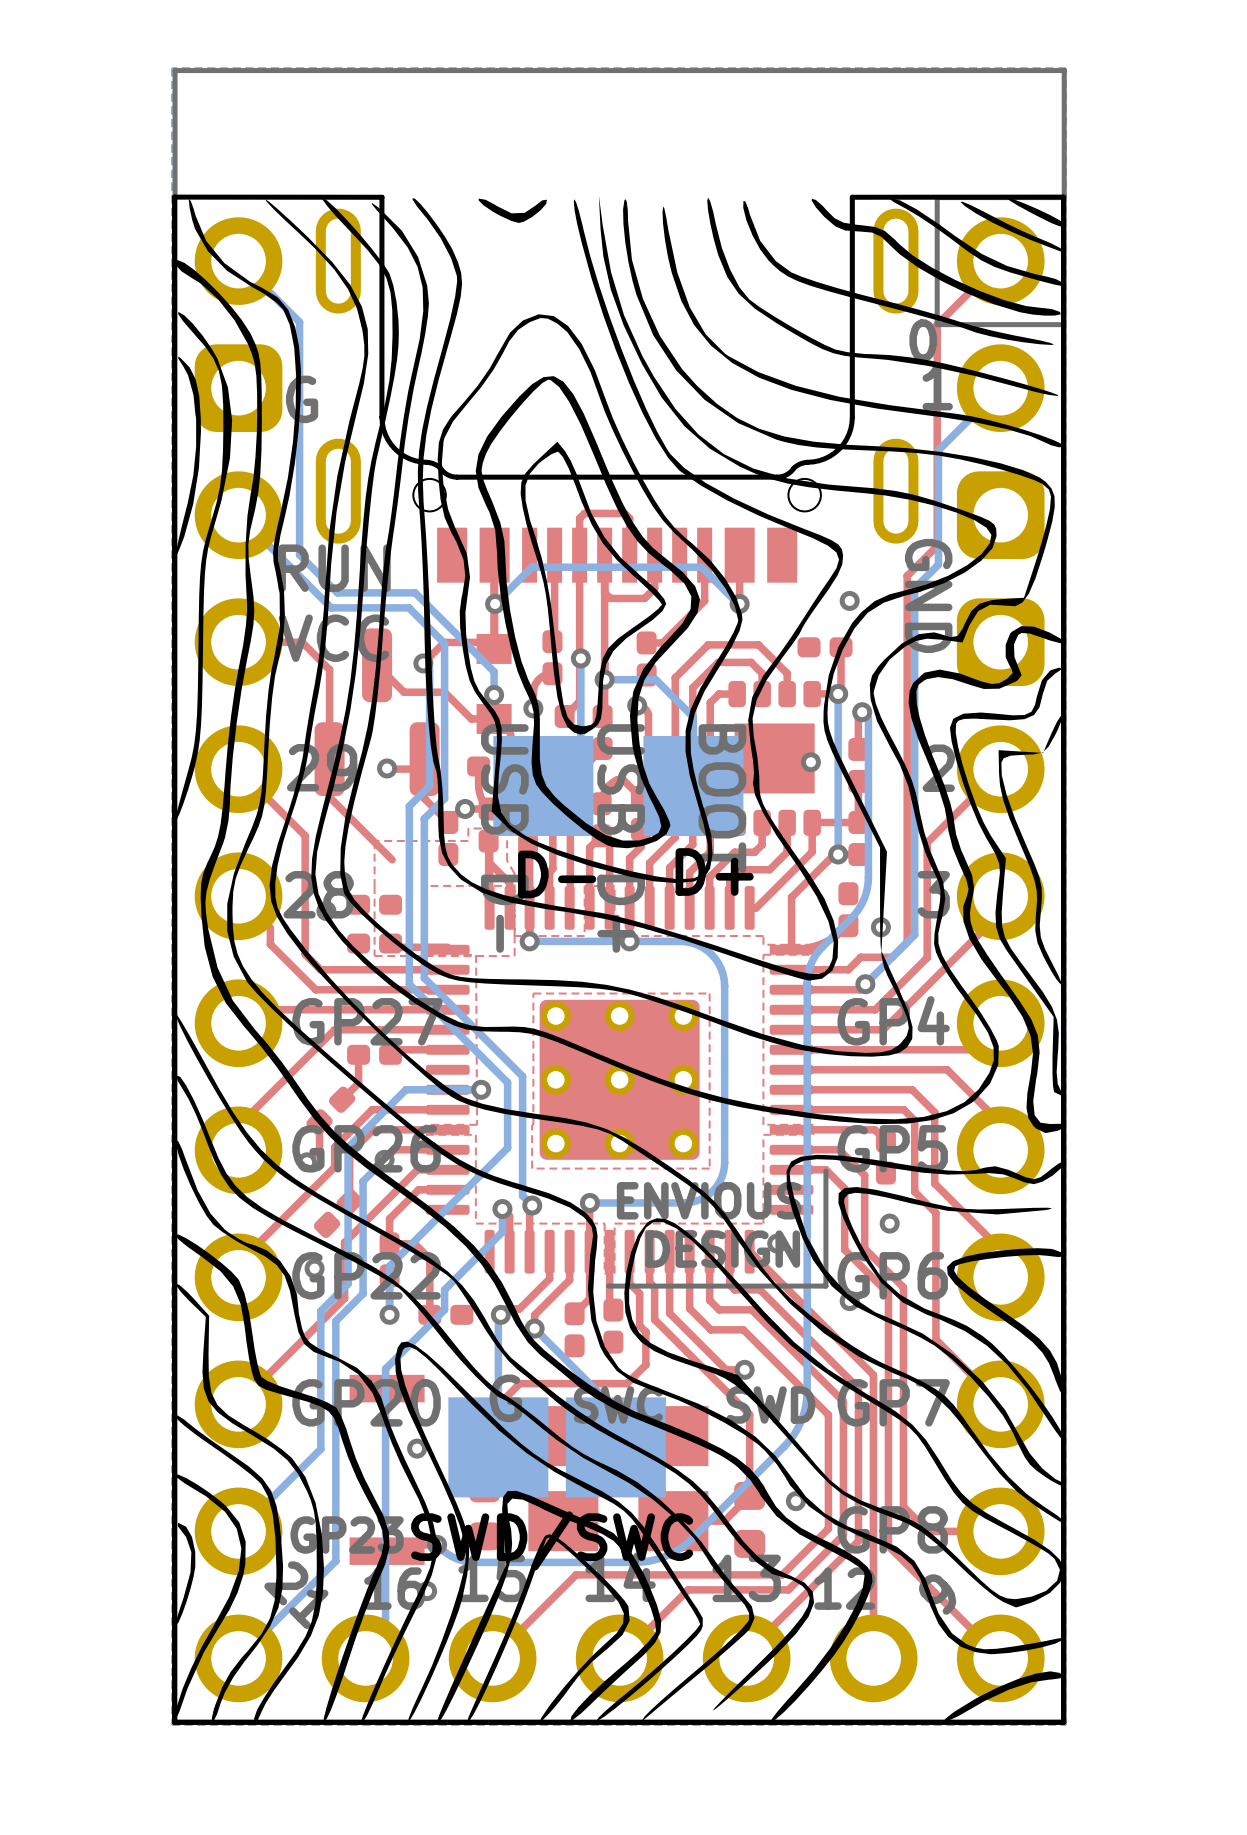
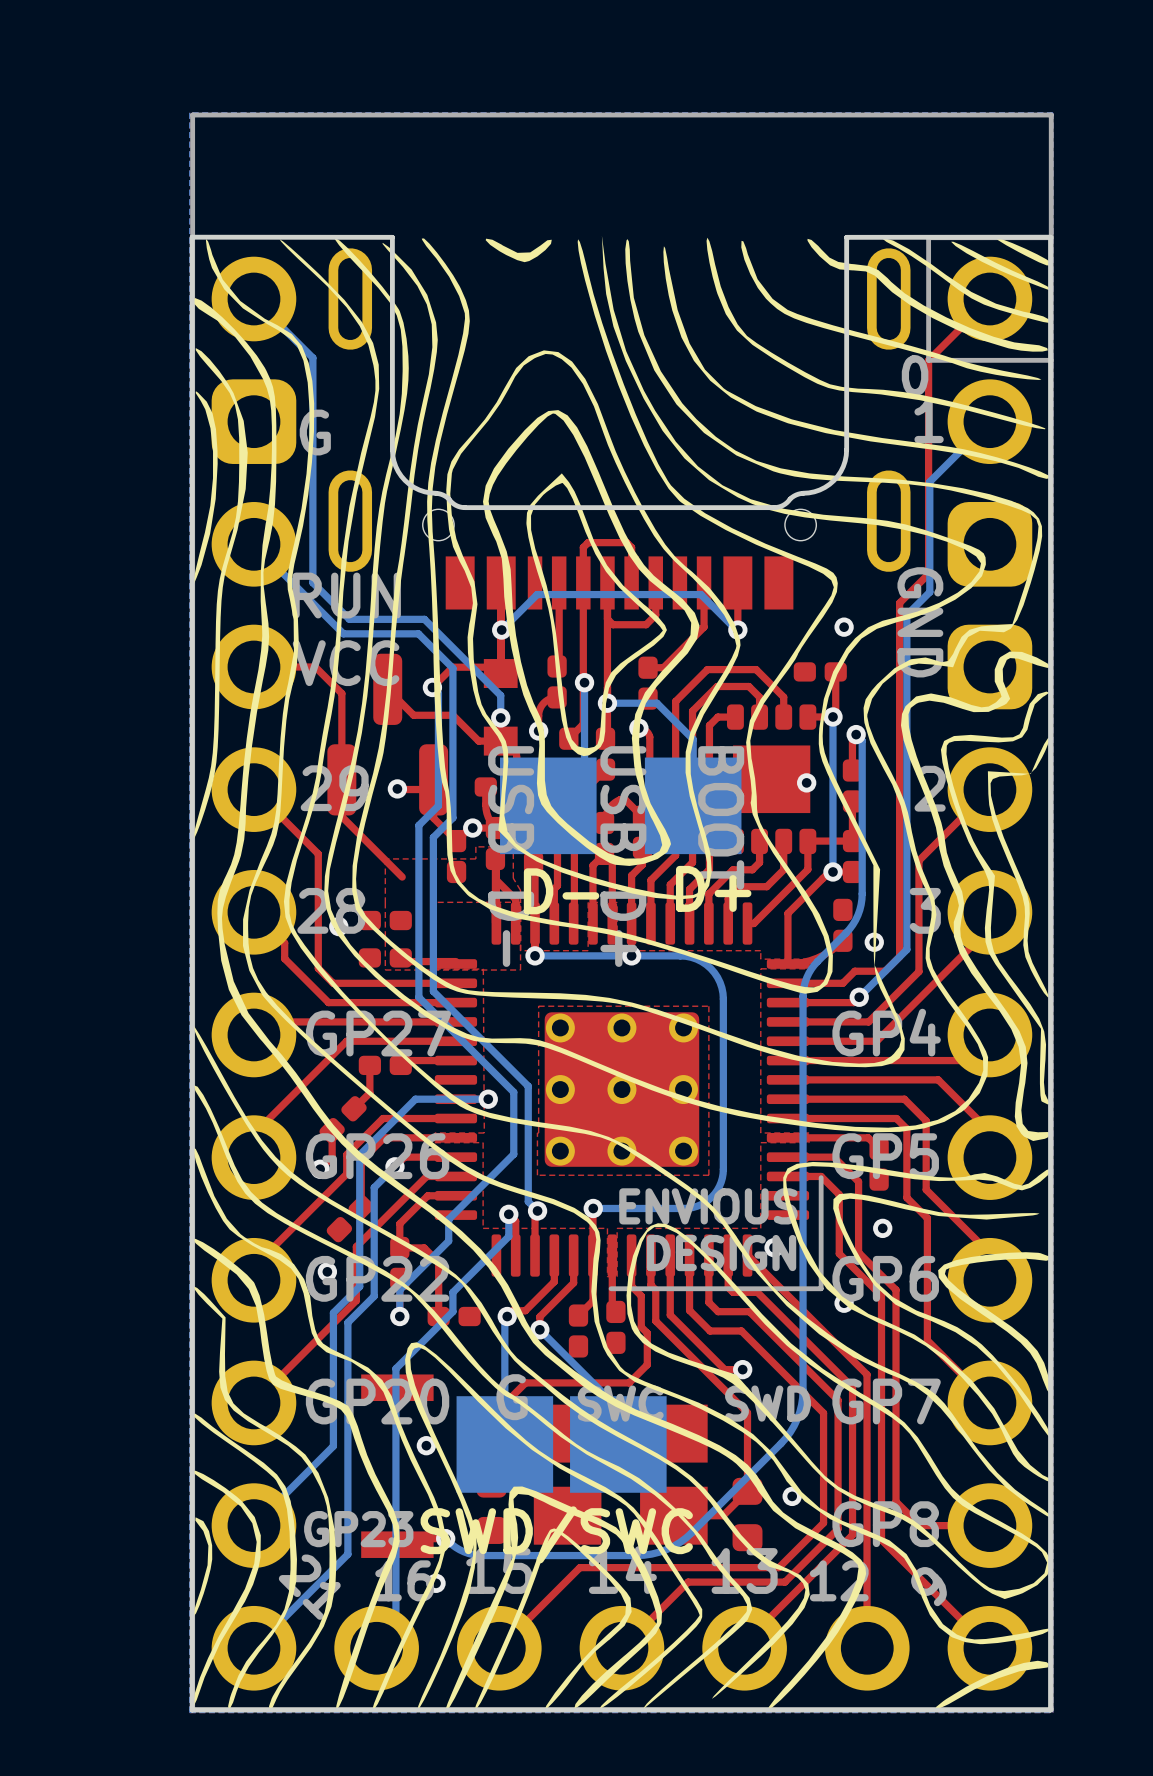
bottom track: (507, 1146) (389, 1266) (389, 1287) -> (513, 1154) (448, 1219) (448, 1241) (399, 1289)

